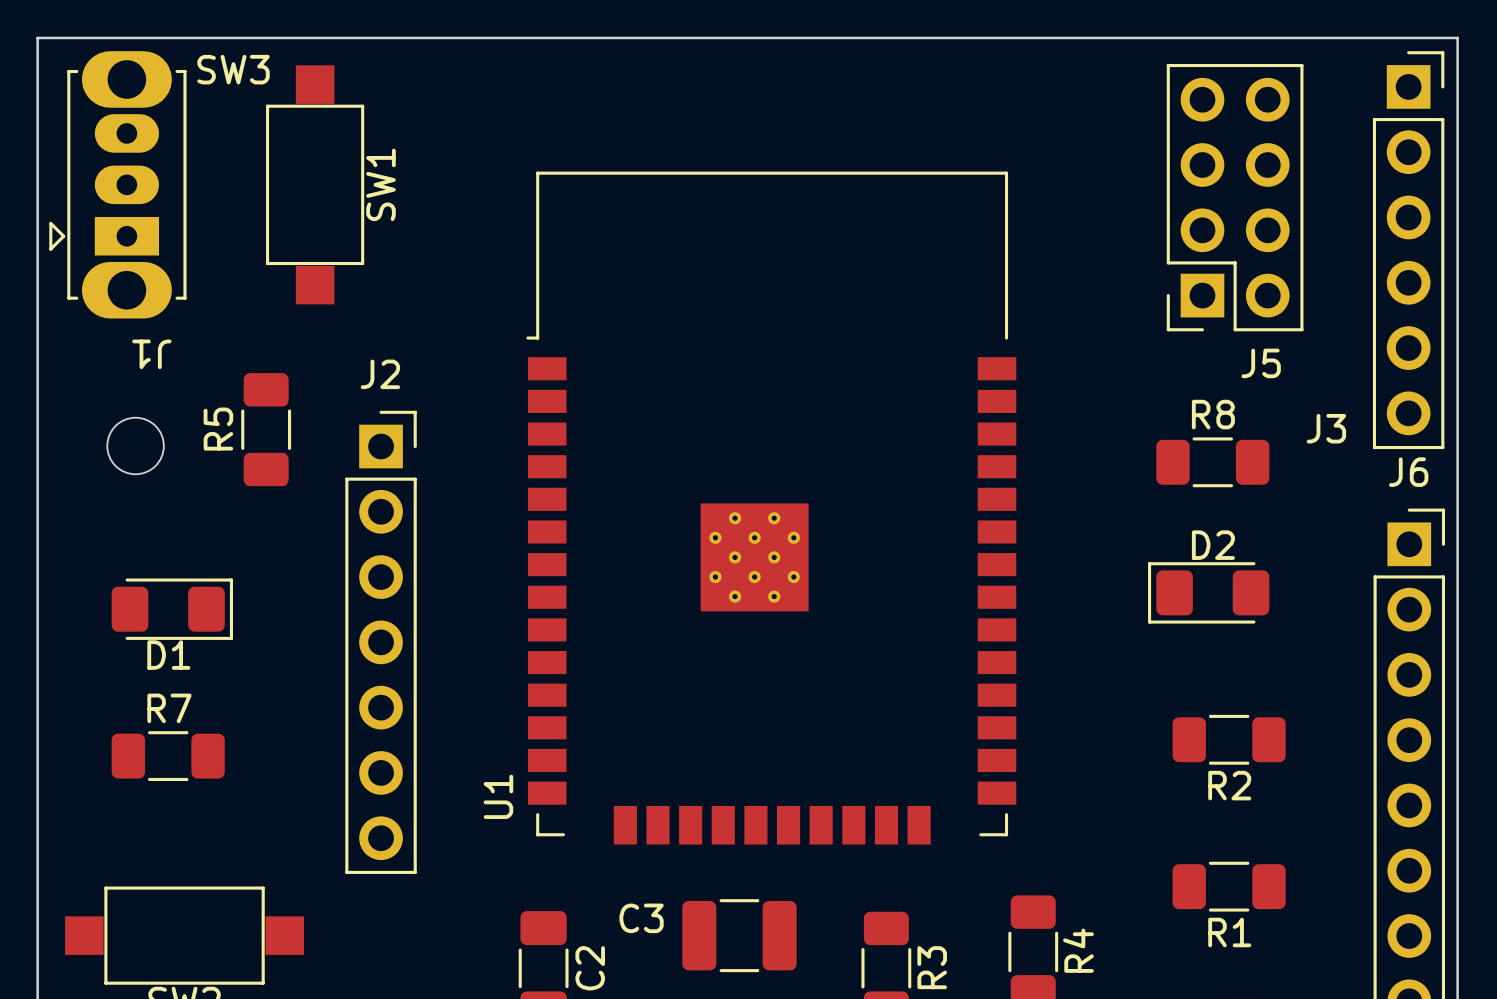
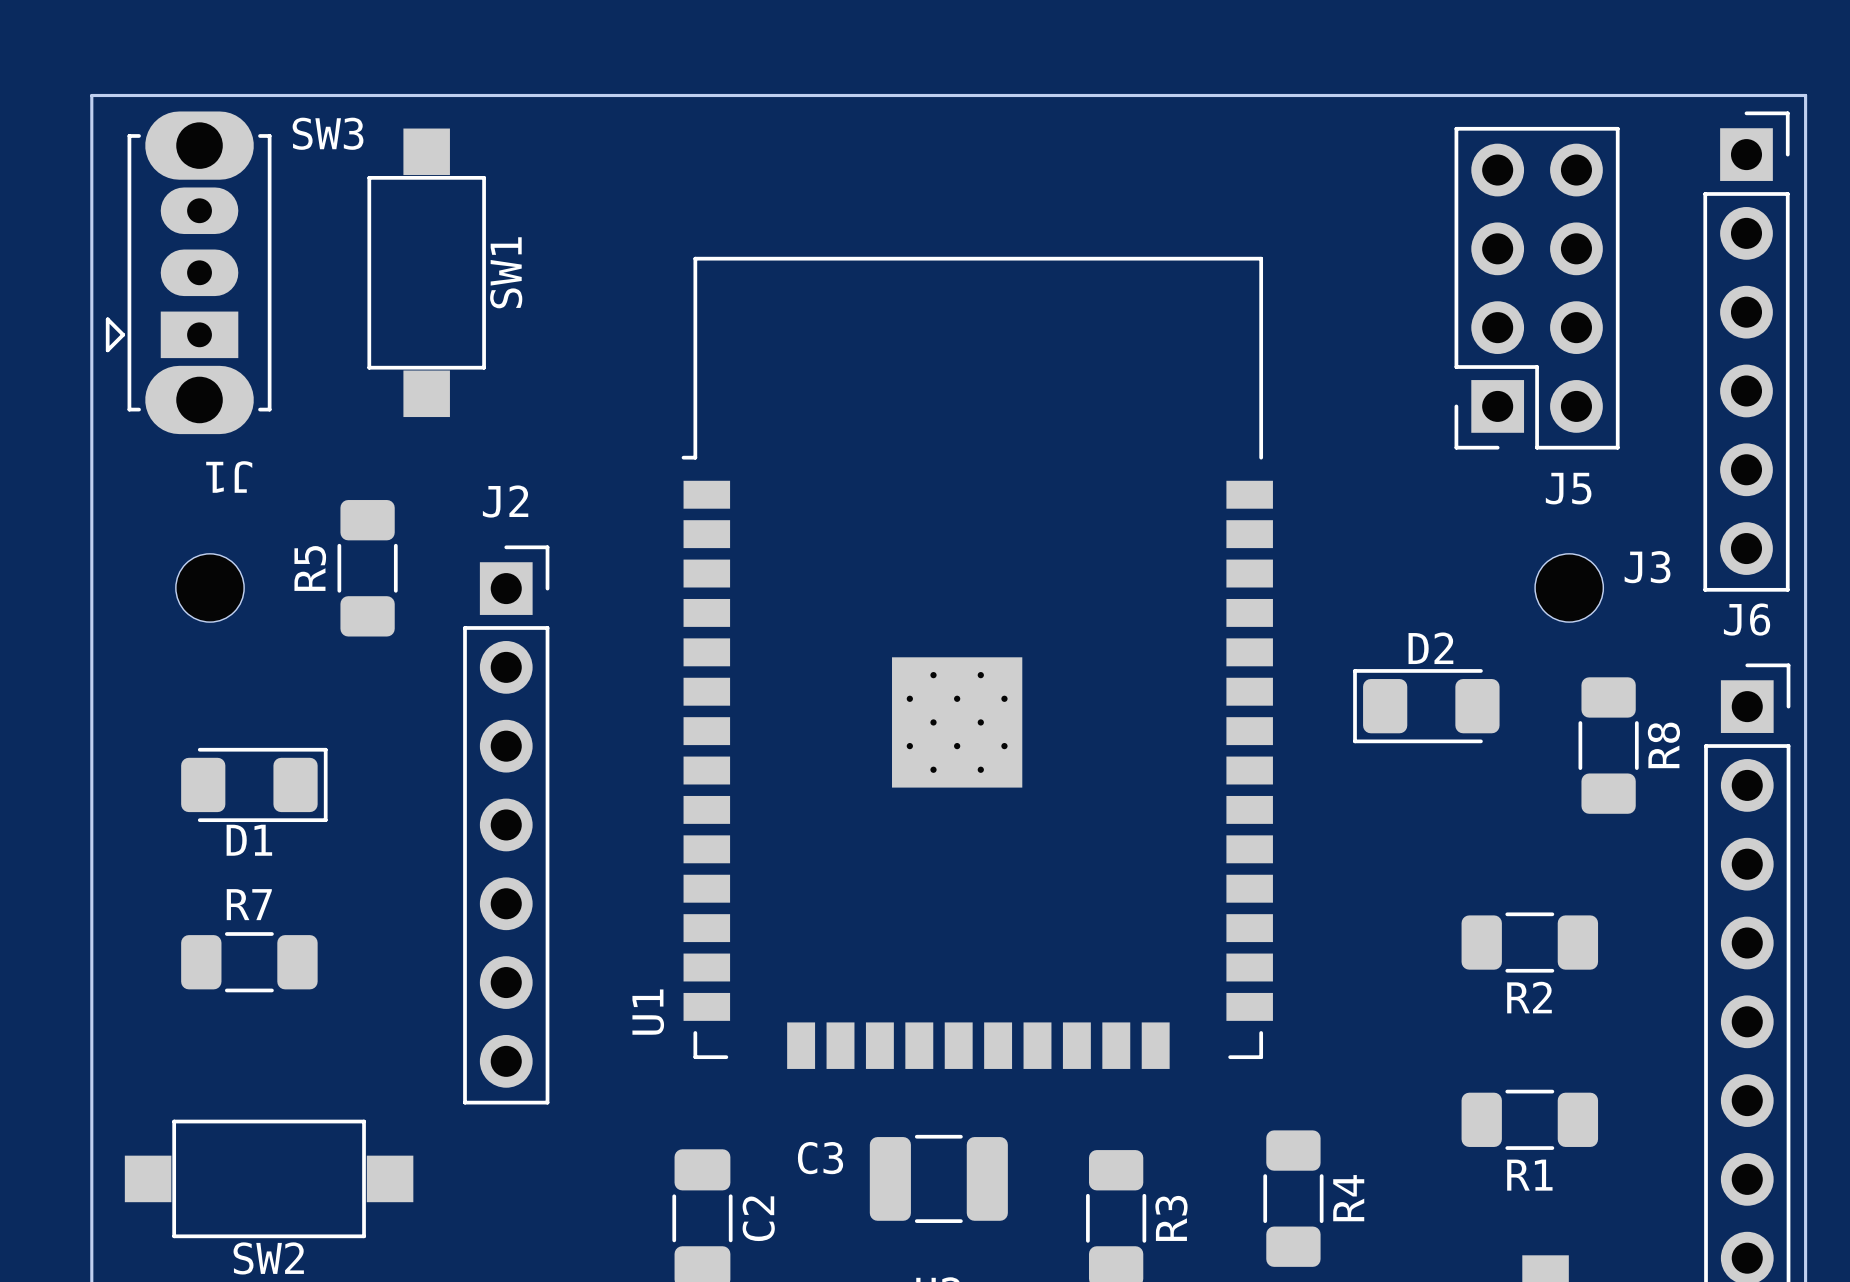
part: none -> (1569, 587)
R8 rotation: 0° (1212, 462) -> 90° clockwise (1608, 745)
R8 position: (1212, 462) -> (1608, 745)
D2 position: (1208, 592) -> (1426, 706)

